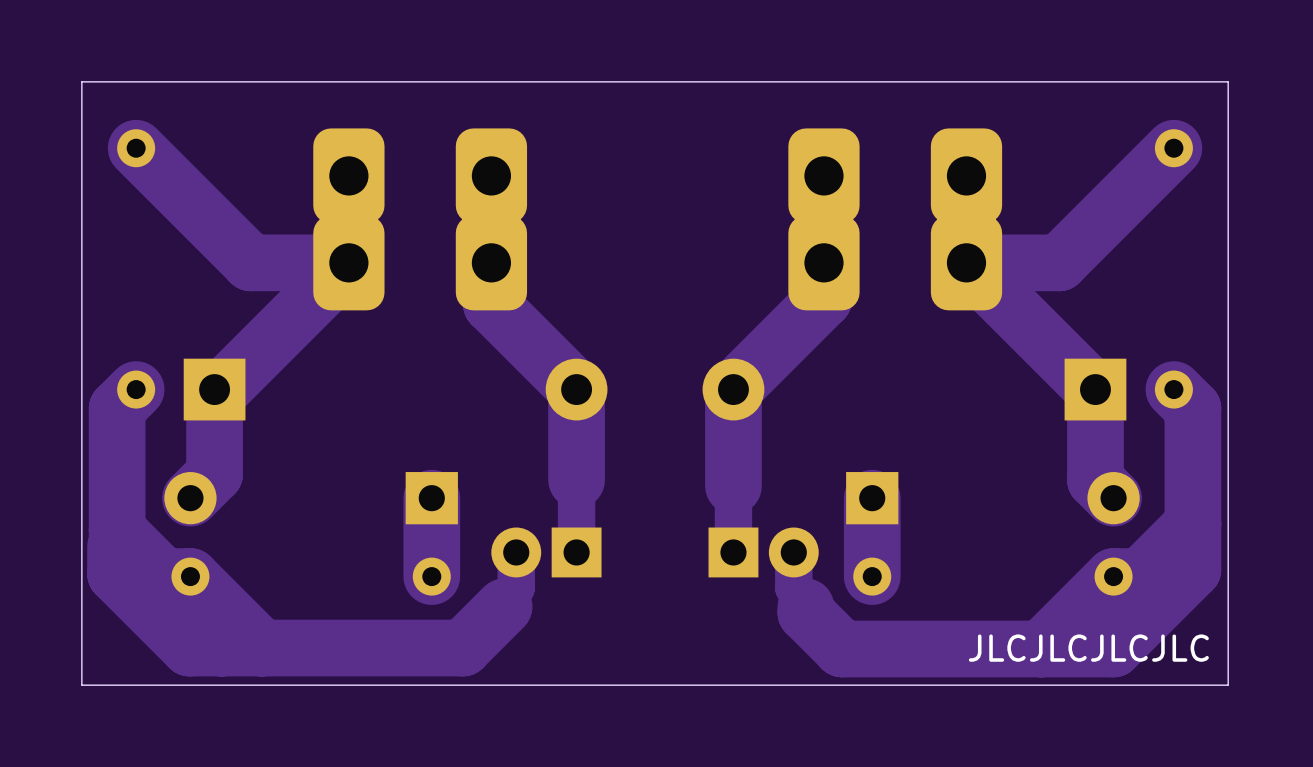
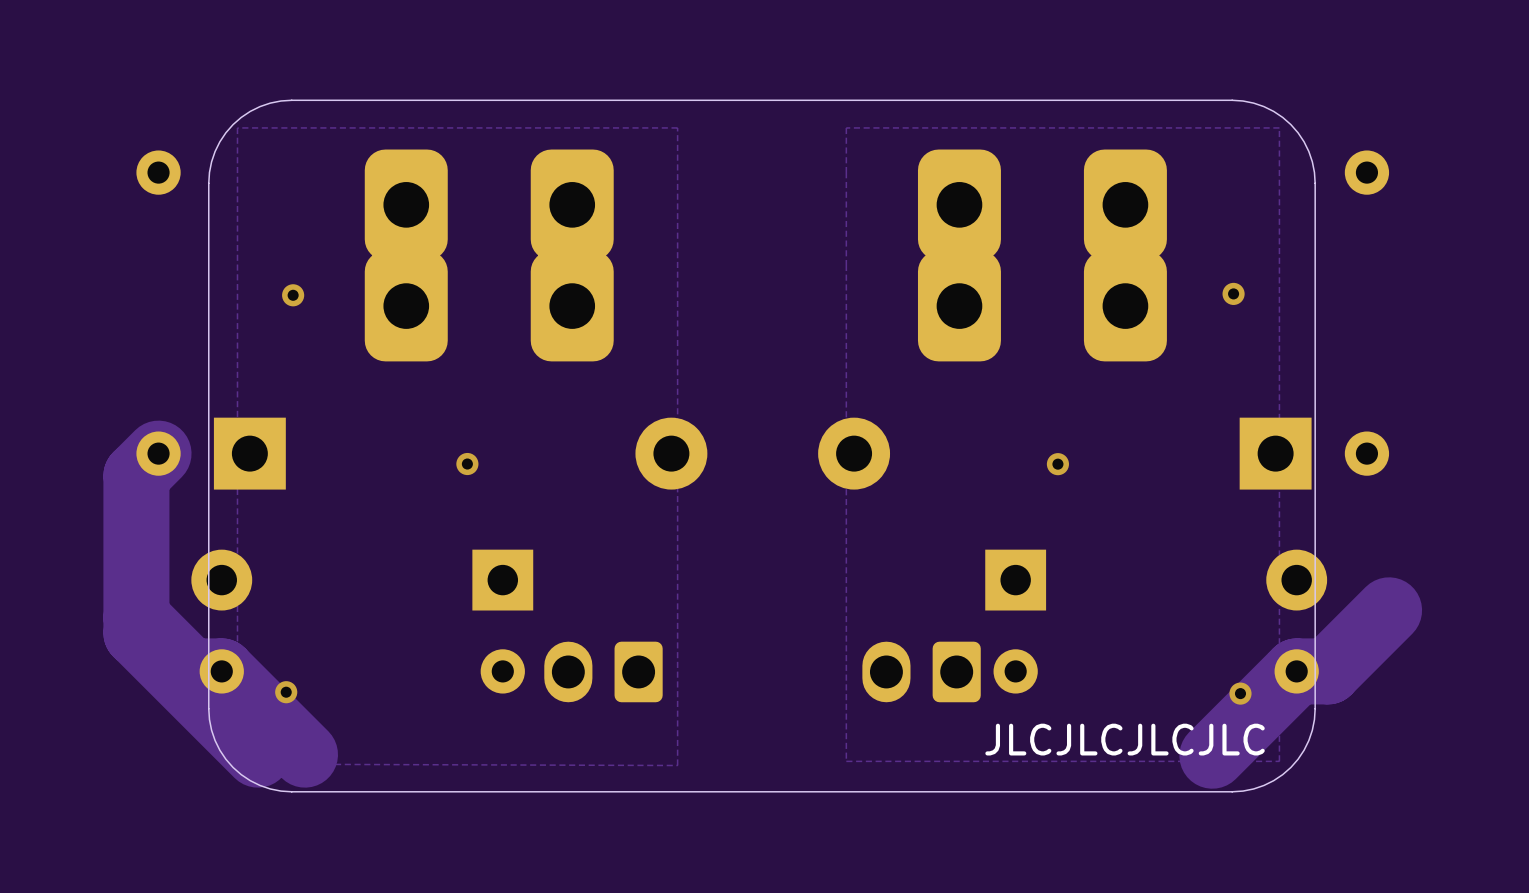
board edge: (1228, 81) (1228, 685) (81, 685) (81, 81) (1228, 81) -> (1232, 100) (1263, 106) (1290, 124) (1308, 151) (1315, 183) (1314, 719) (1308, 740) (1298, 759) (1273, 780) (1253, 788) (1232, 791) (291, 791) (270, 788) (250, 780) (233, 767) (219, 750) (211, 730) (208, 708) (208, 183) (211, 161) (219, 141) (233, 124) (250, 111) (270, 103) (291, 100) (1232, 100)
zone outline: none -> (677, 127) (237, 127) (237, 764) (677, 765) (677, 127)
zone outline: none -> (1279, 127) (1279, 761) (846, 761) (846, 127) (1279, 127)
track: (136, 148) (250, 262) (348, 262) (222, 389) (214, 389) (214, 474) (190, 498) -> none
track: (1173, 148) (1059, 262) (966, 262) (1093, 389) (1095, 389) (1095, 480) (1113, 498) -> none
via: none -> (1233, 293)
via: none -> (293, 295)
track: (491, 262) (491, 304) (576, 389) (576, 552) -> none
track: (823, 262) (823, 299) (733, 389) (733, 552) -> none
track: (1173, 389) (1192, 408) (1192, 569) (1113, 649) (842, 649) (805, 612) (805, 606) (793, 587) (793, 552) -> none
via: none -> (467, 464)
via: none -> (1057, 464)
track: (431, 498) (431, 576) -> none
track: (872, 498) (872, 576) -> none
track: (115, 546) (115, 574) (189, 648) (462, 648) (504, 606) (516, 587) (516, 552) -> none
part: (546, 552) -> none
part: (763, 552) -> none
part: none -> (603, 671)
part: none -> (921, 671)
via: none -> (286, 692)
via: none -> (1240, 693)
text position: JLCJLCJLCJLC (1088, 648) -> JLCJLCJLCJLC (1125, 739)

